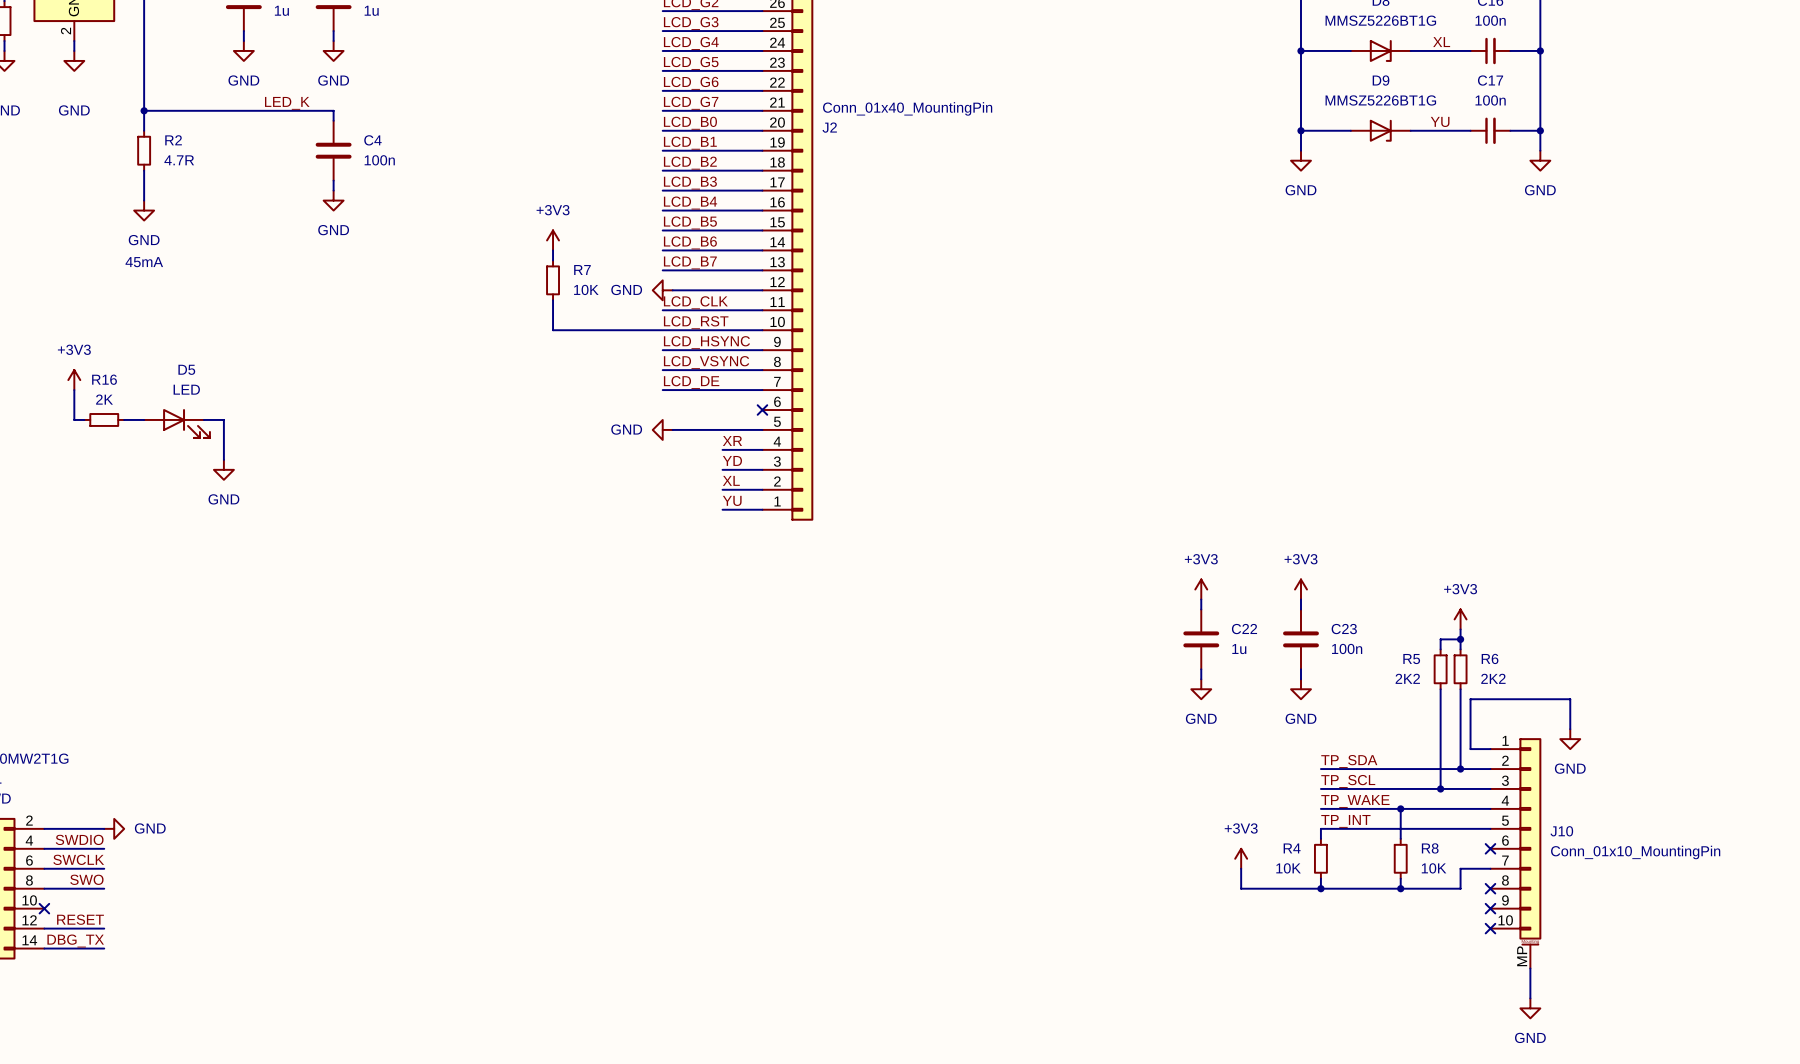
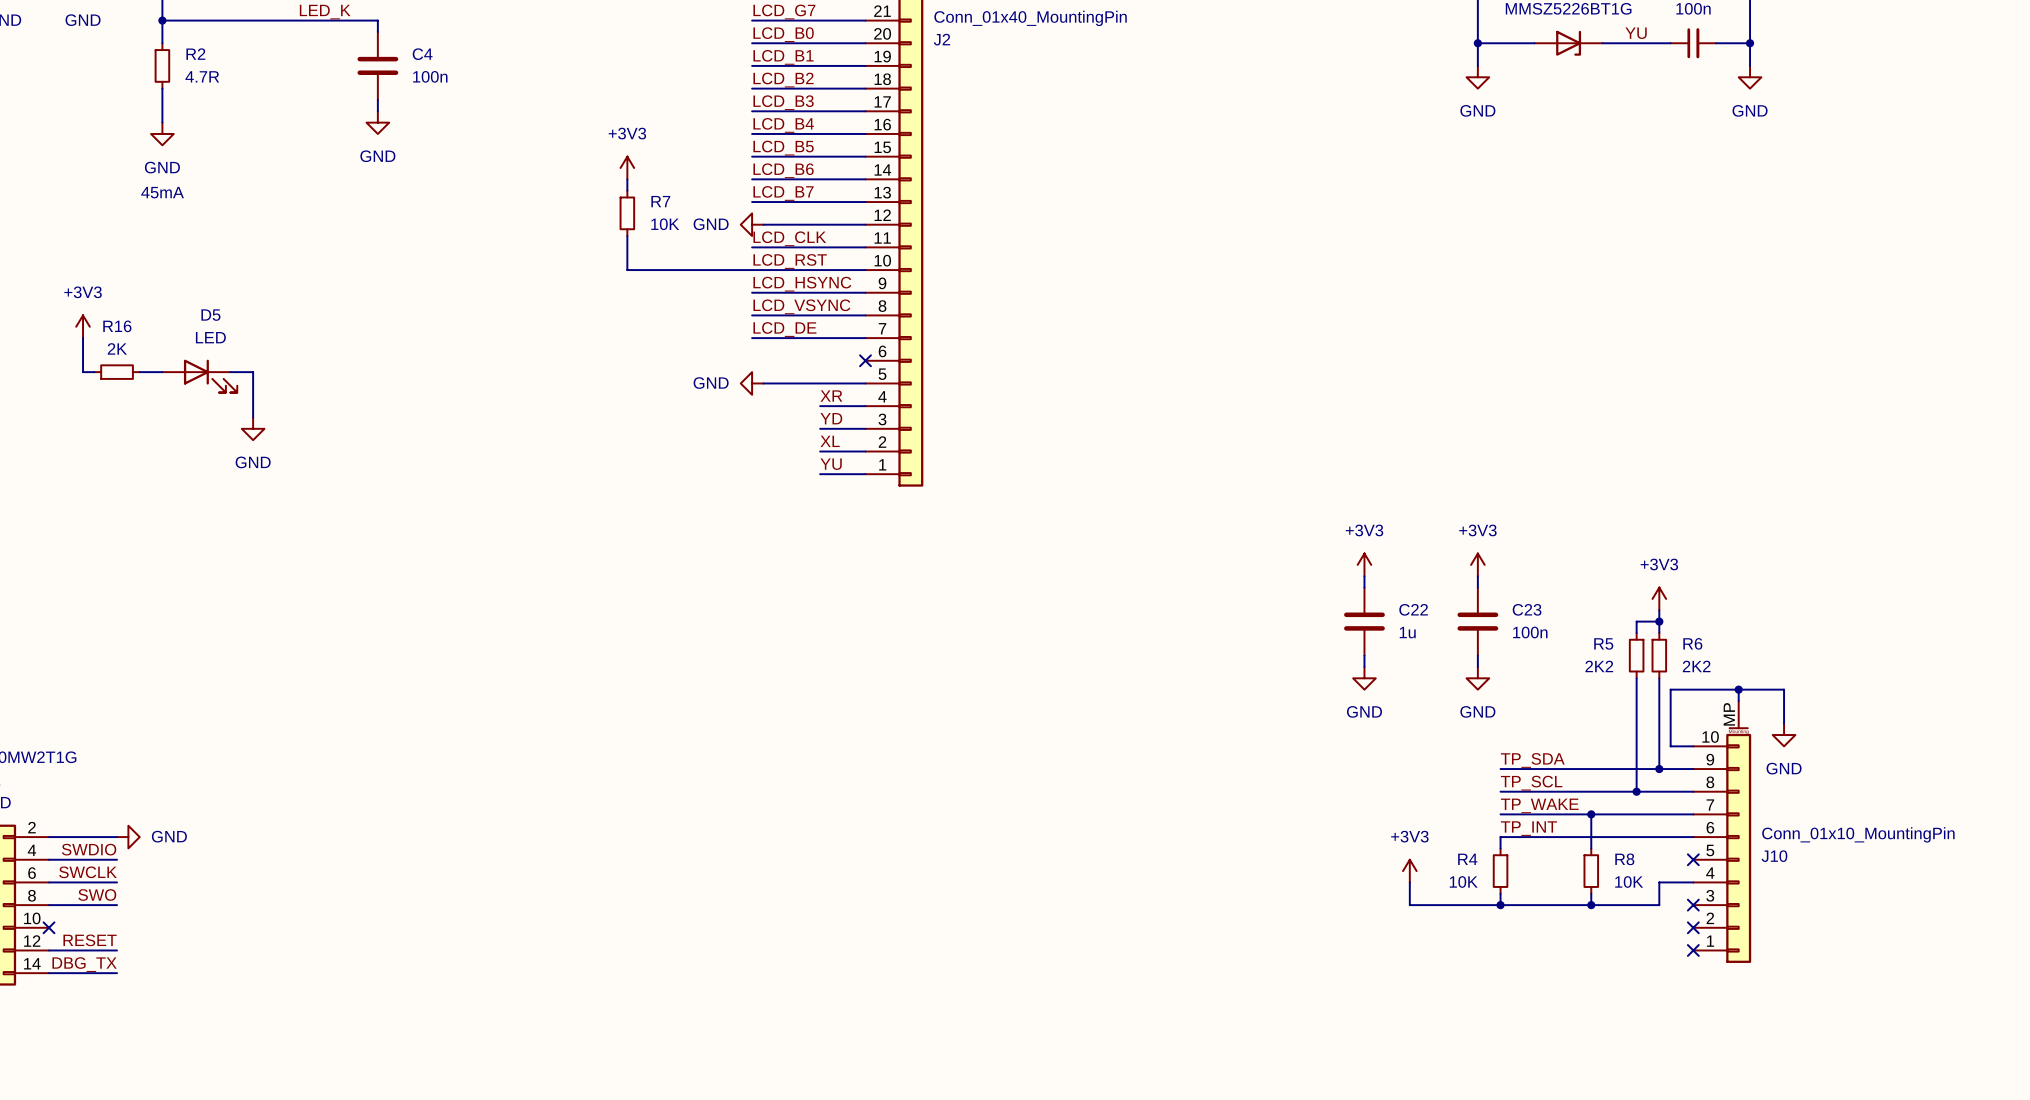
wire: none -> (1738, 689) (1738, 700)
junction: none -> (1738, 689)
J10 flip: as is (1530, 841) -> up-down (1738, 845)
wire: (1530, 968) (1530, 998) -> none
power symbol: GND (1530, 1008) -> none

